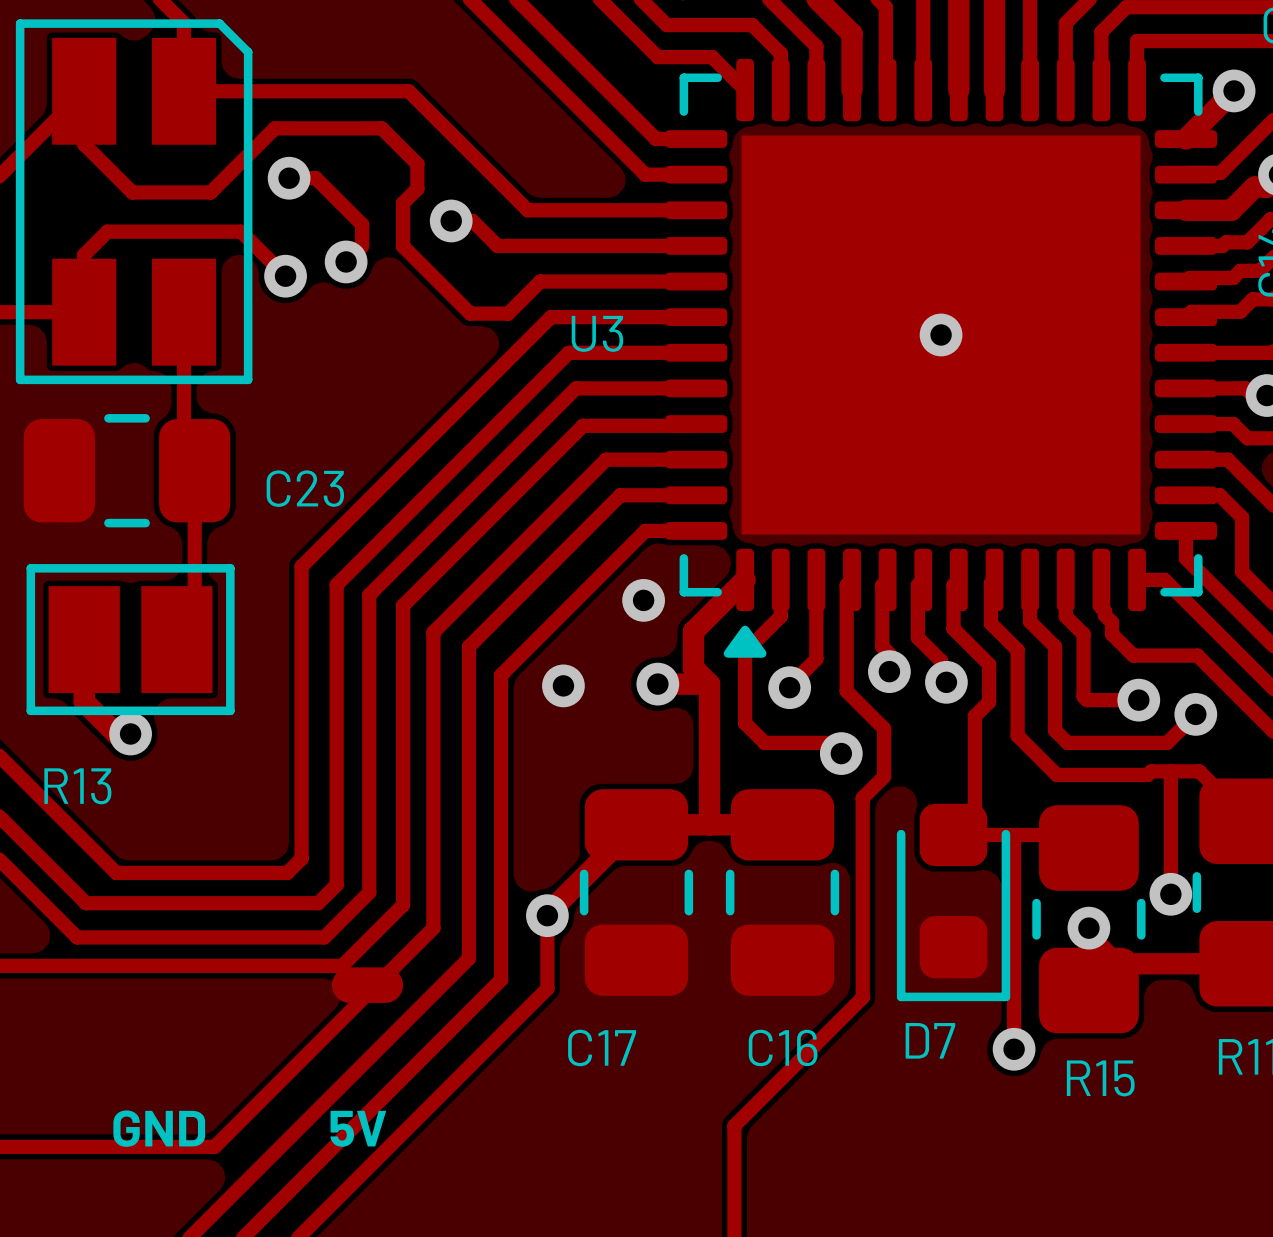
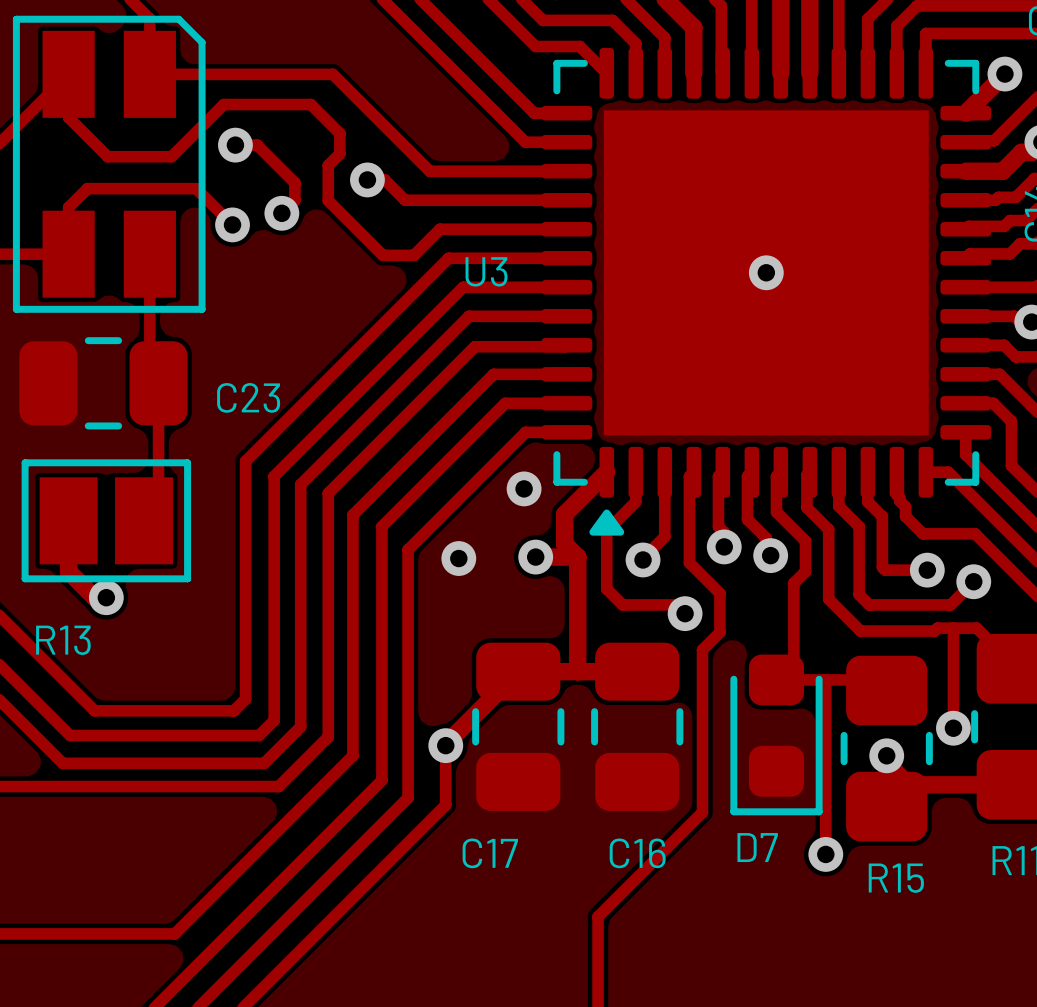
track: (349, 985) (385, 985) -> none
text: GND (159, 1128) -> none
text: 5V (358, 1128) -> none

